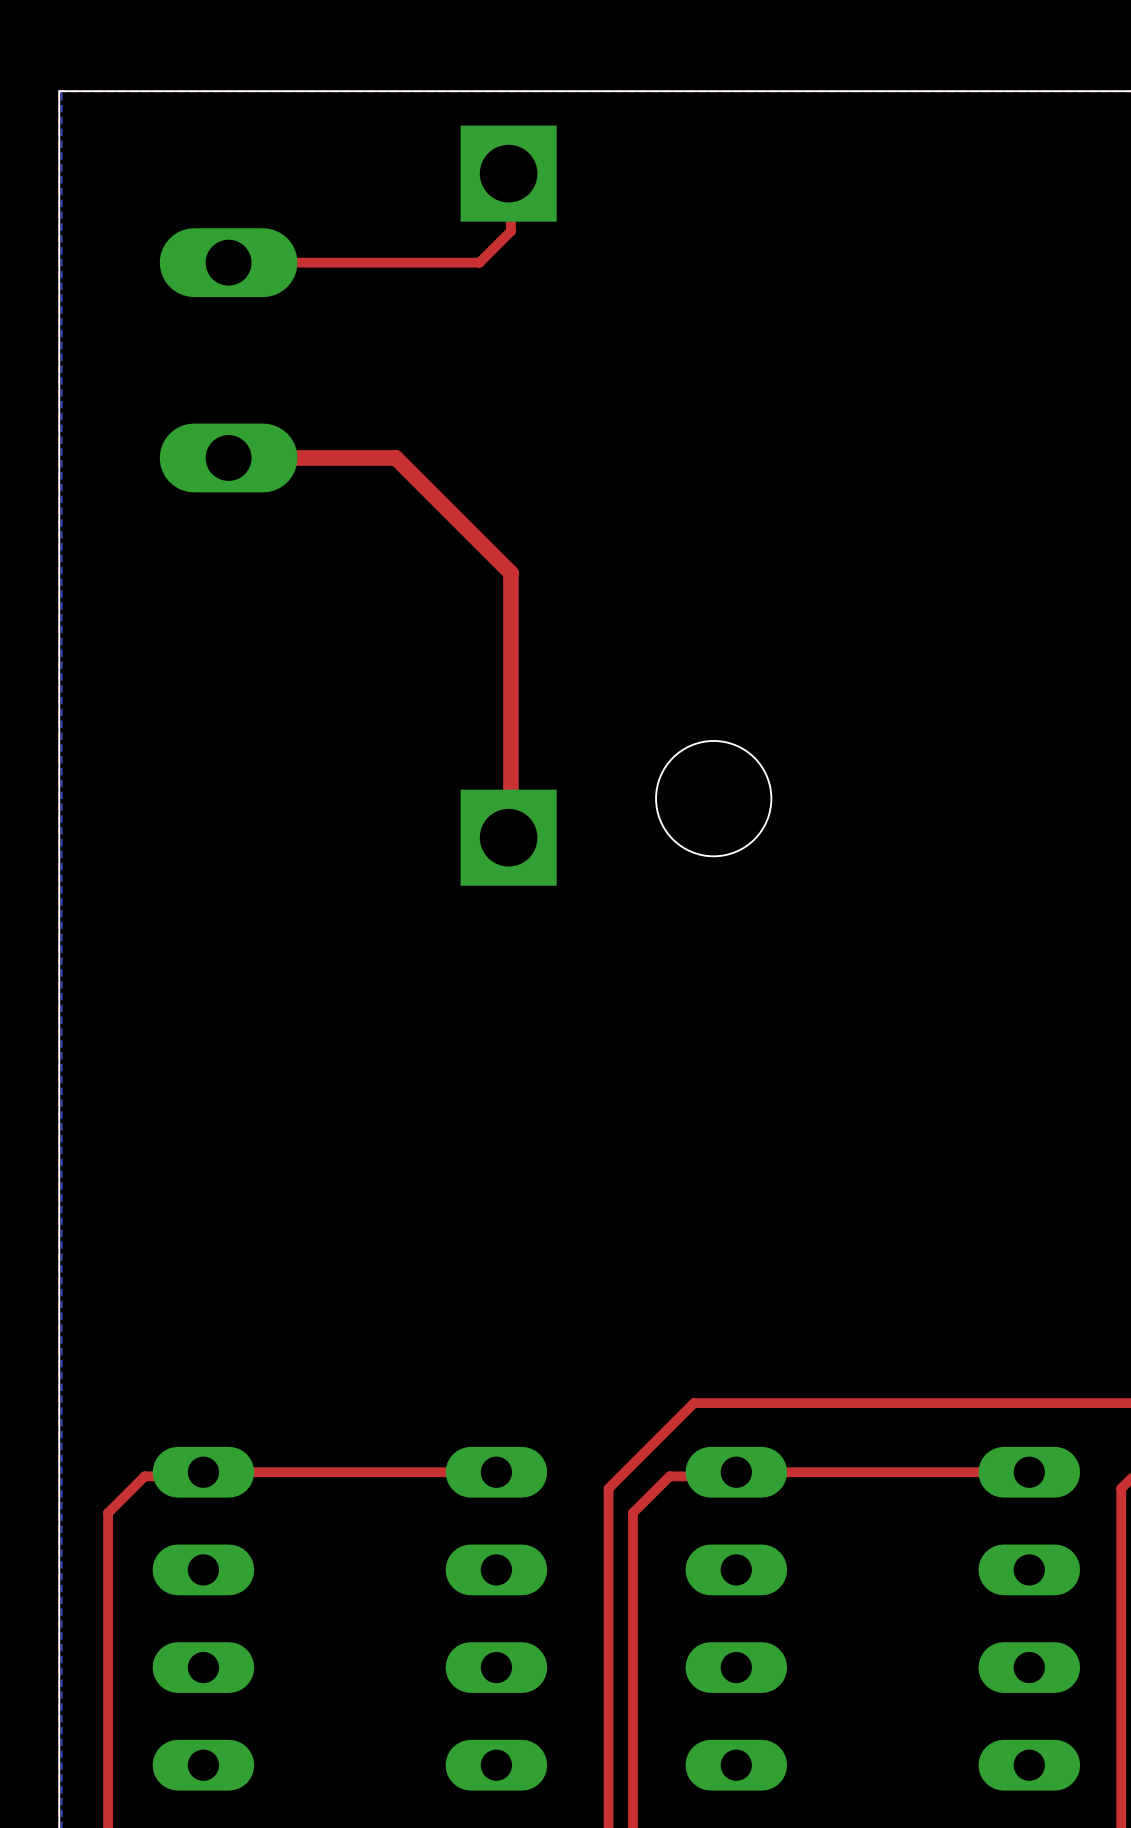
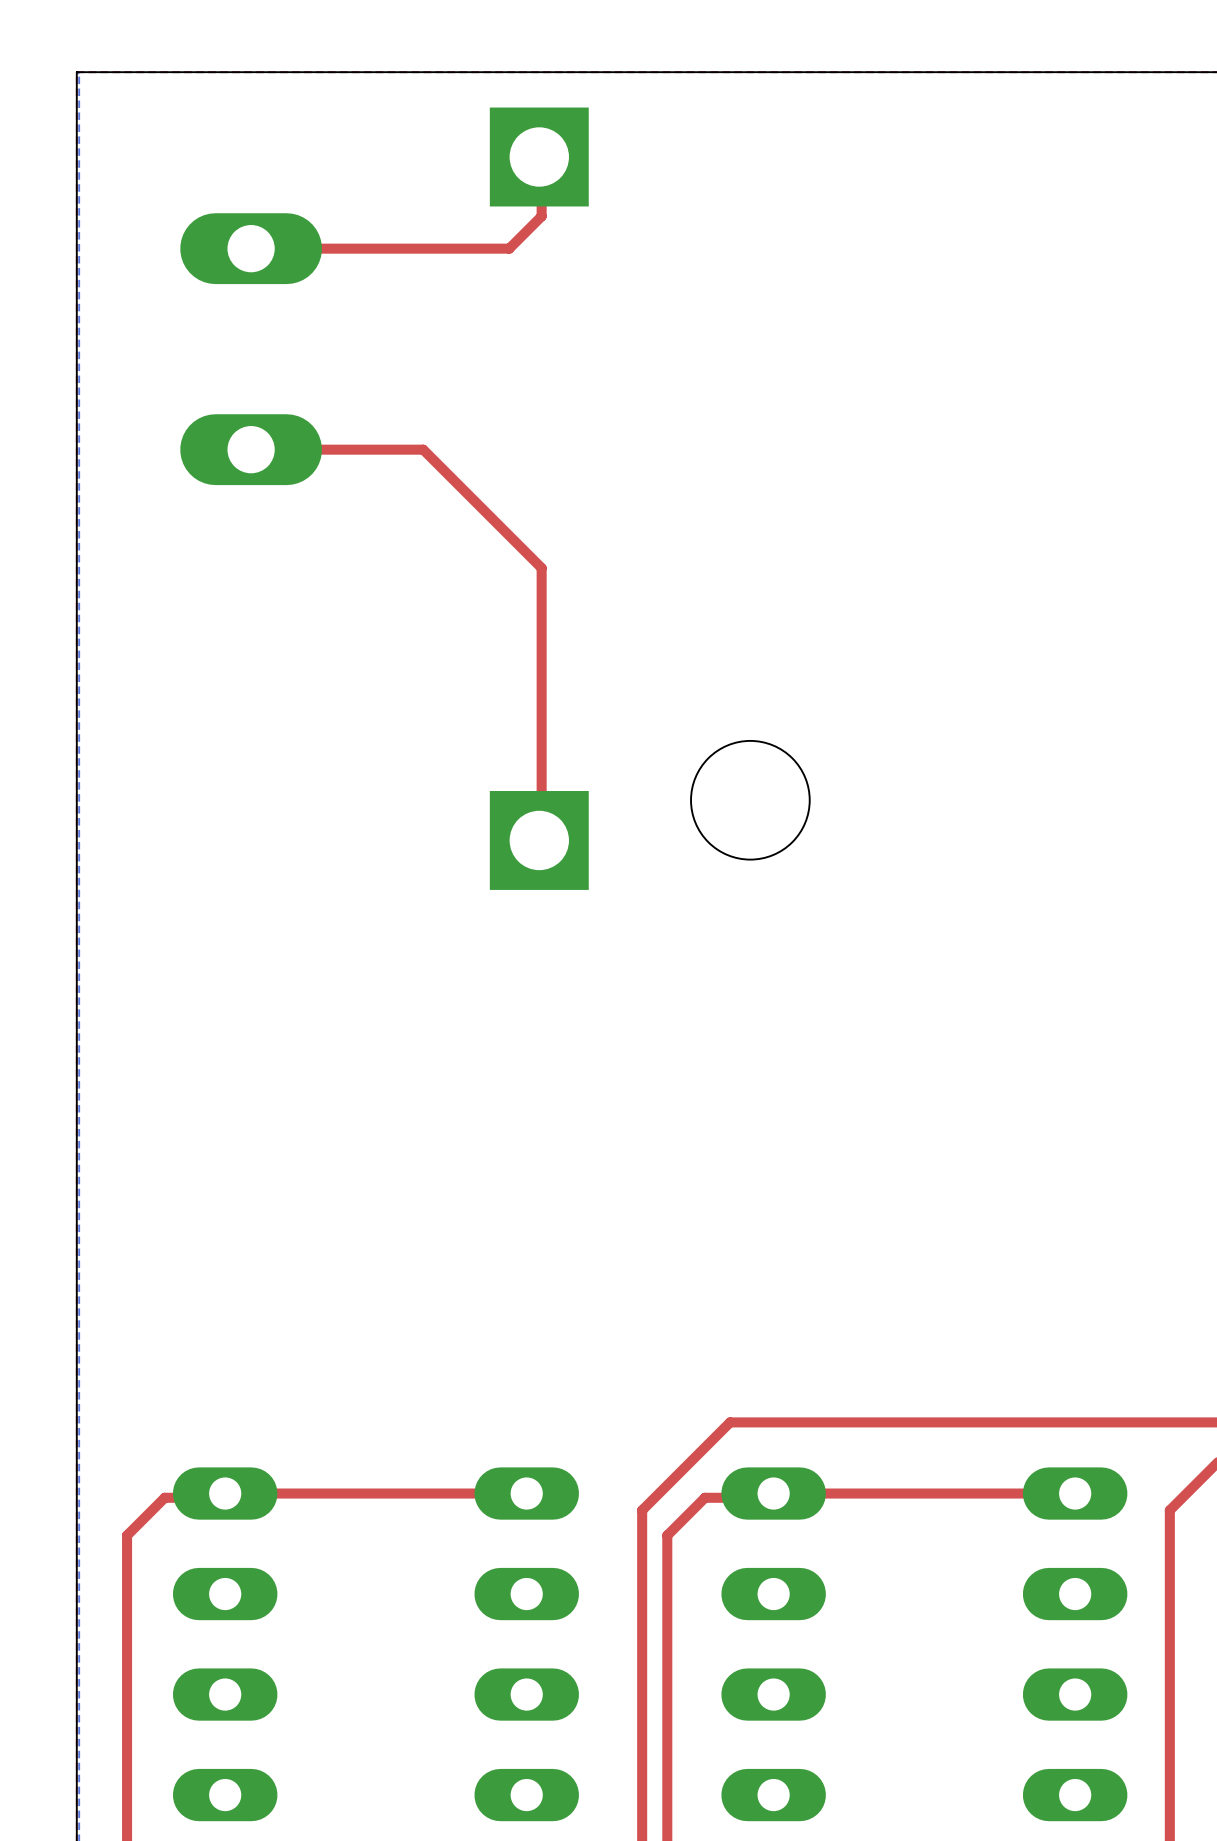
top track width: thick (228, 457) (395, 457) (510, 573) (510, 835) -> thin (251, 449) (423, 449) (541, 568) (541, 838)

